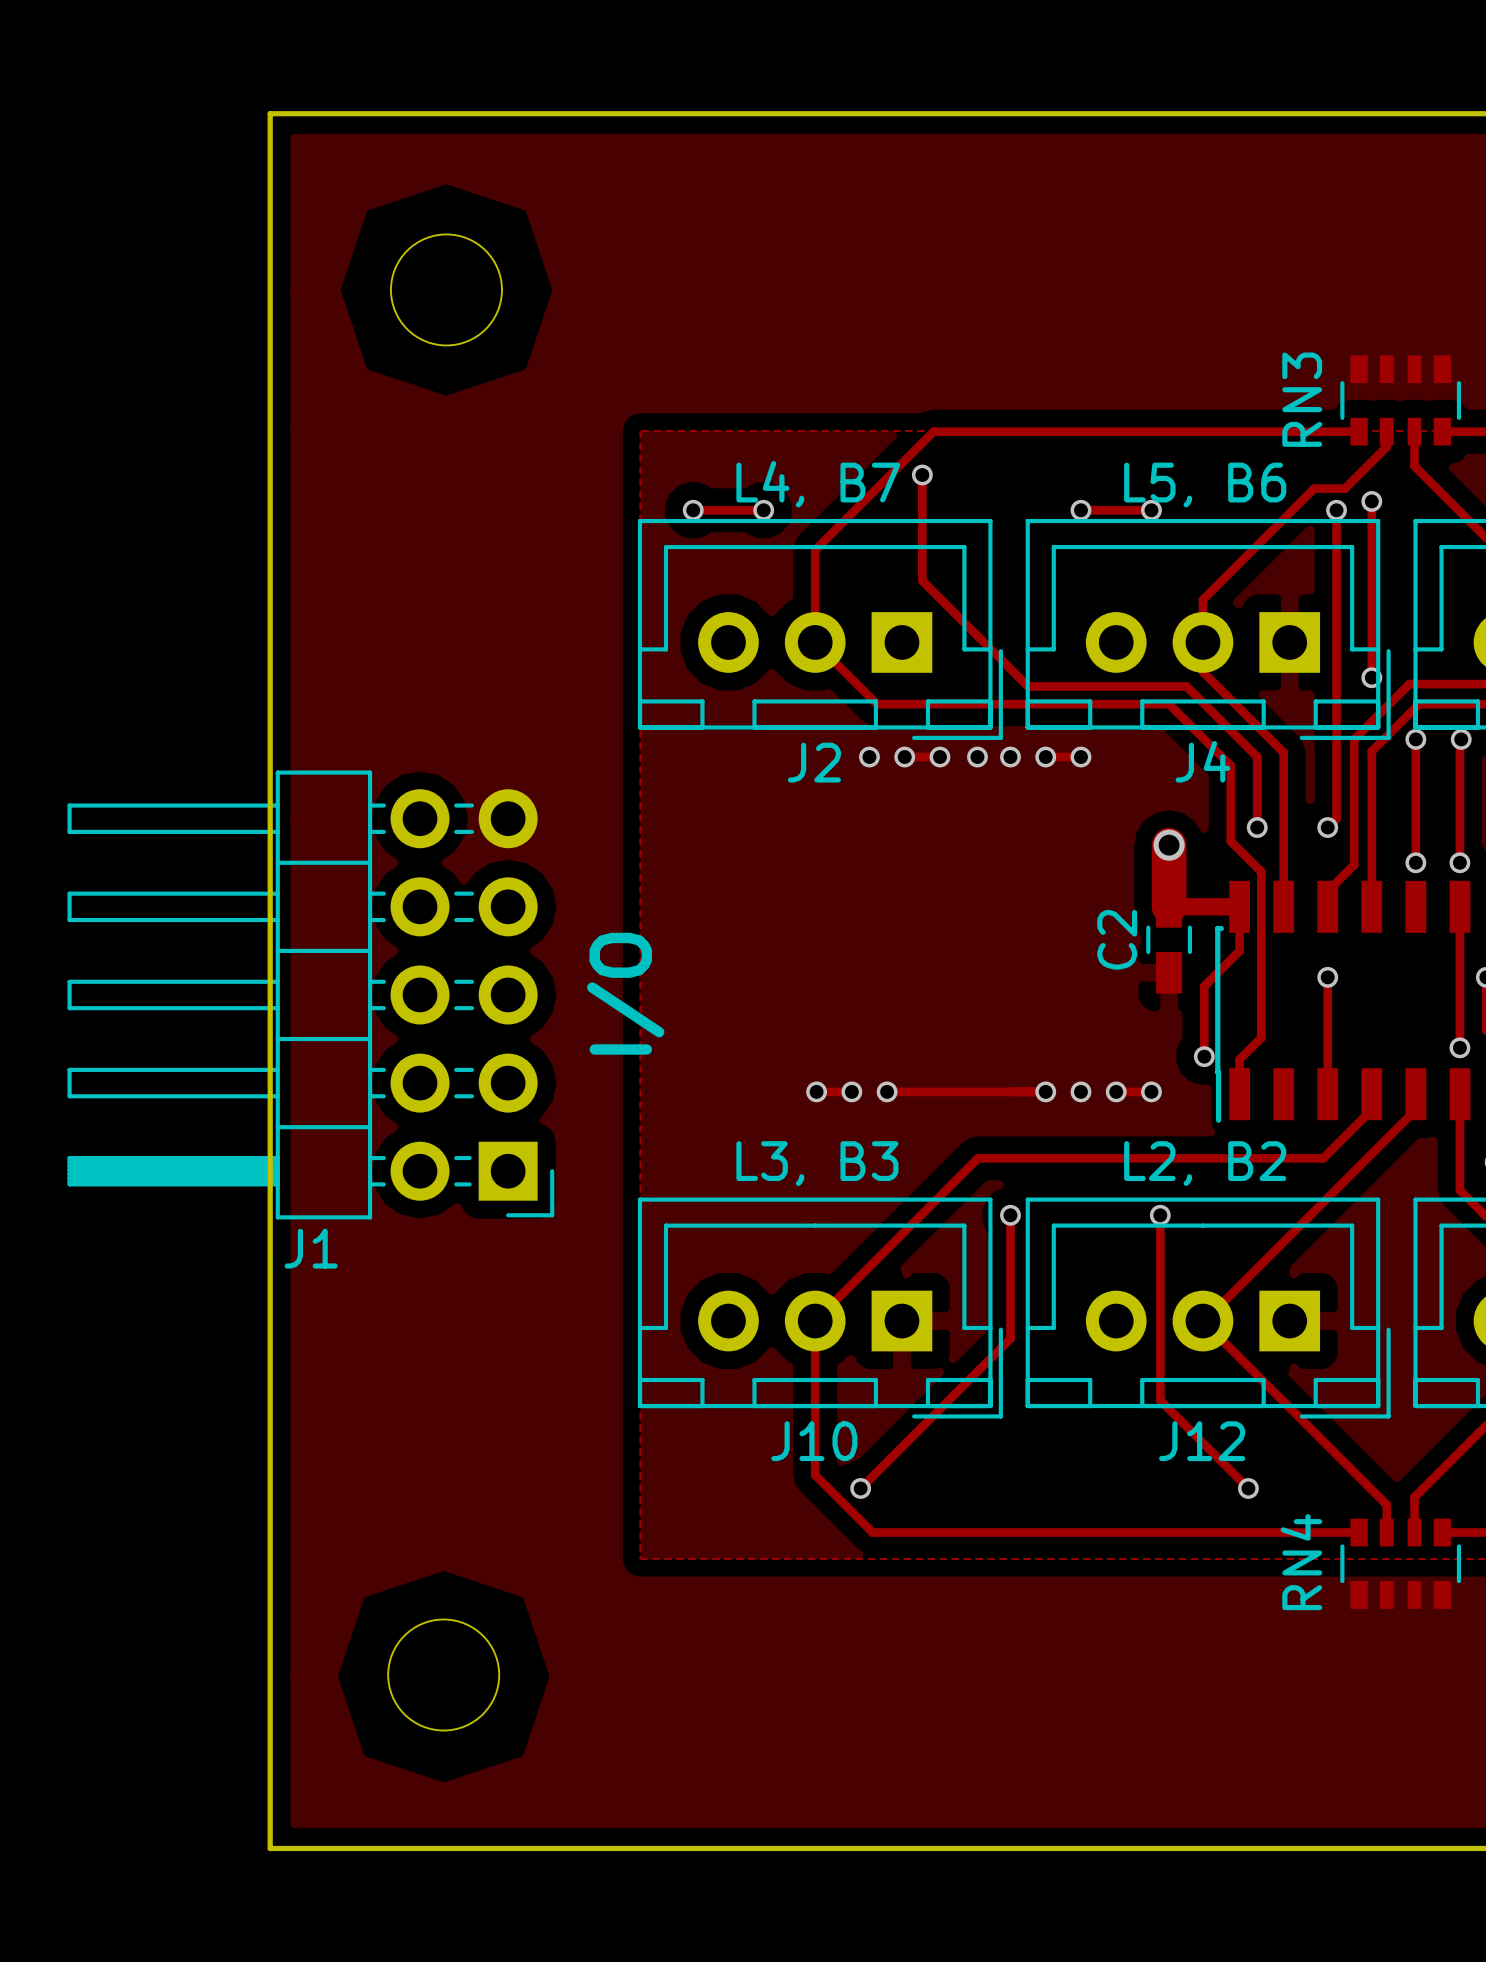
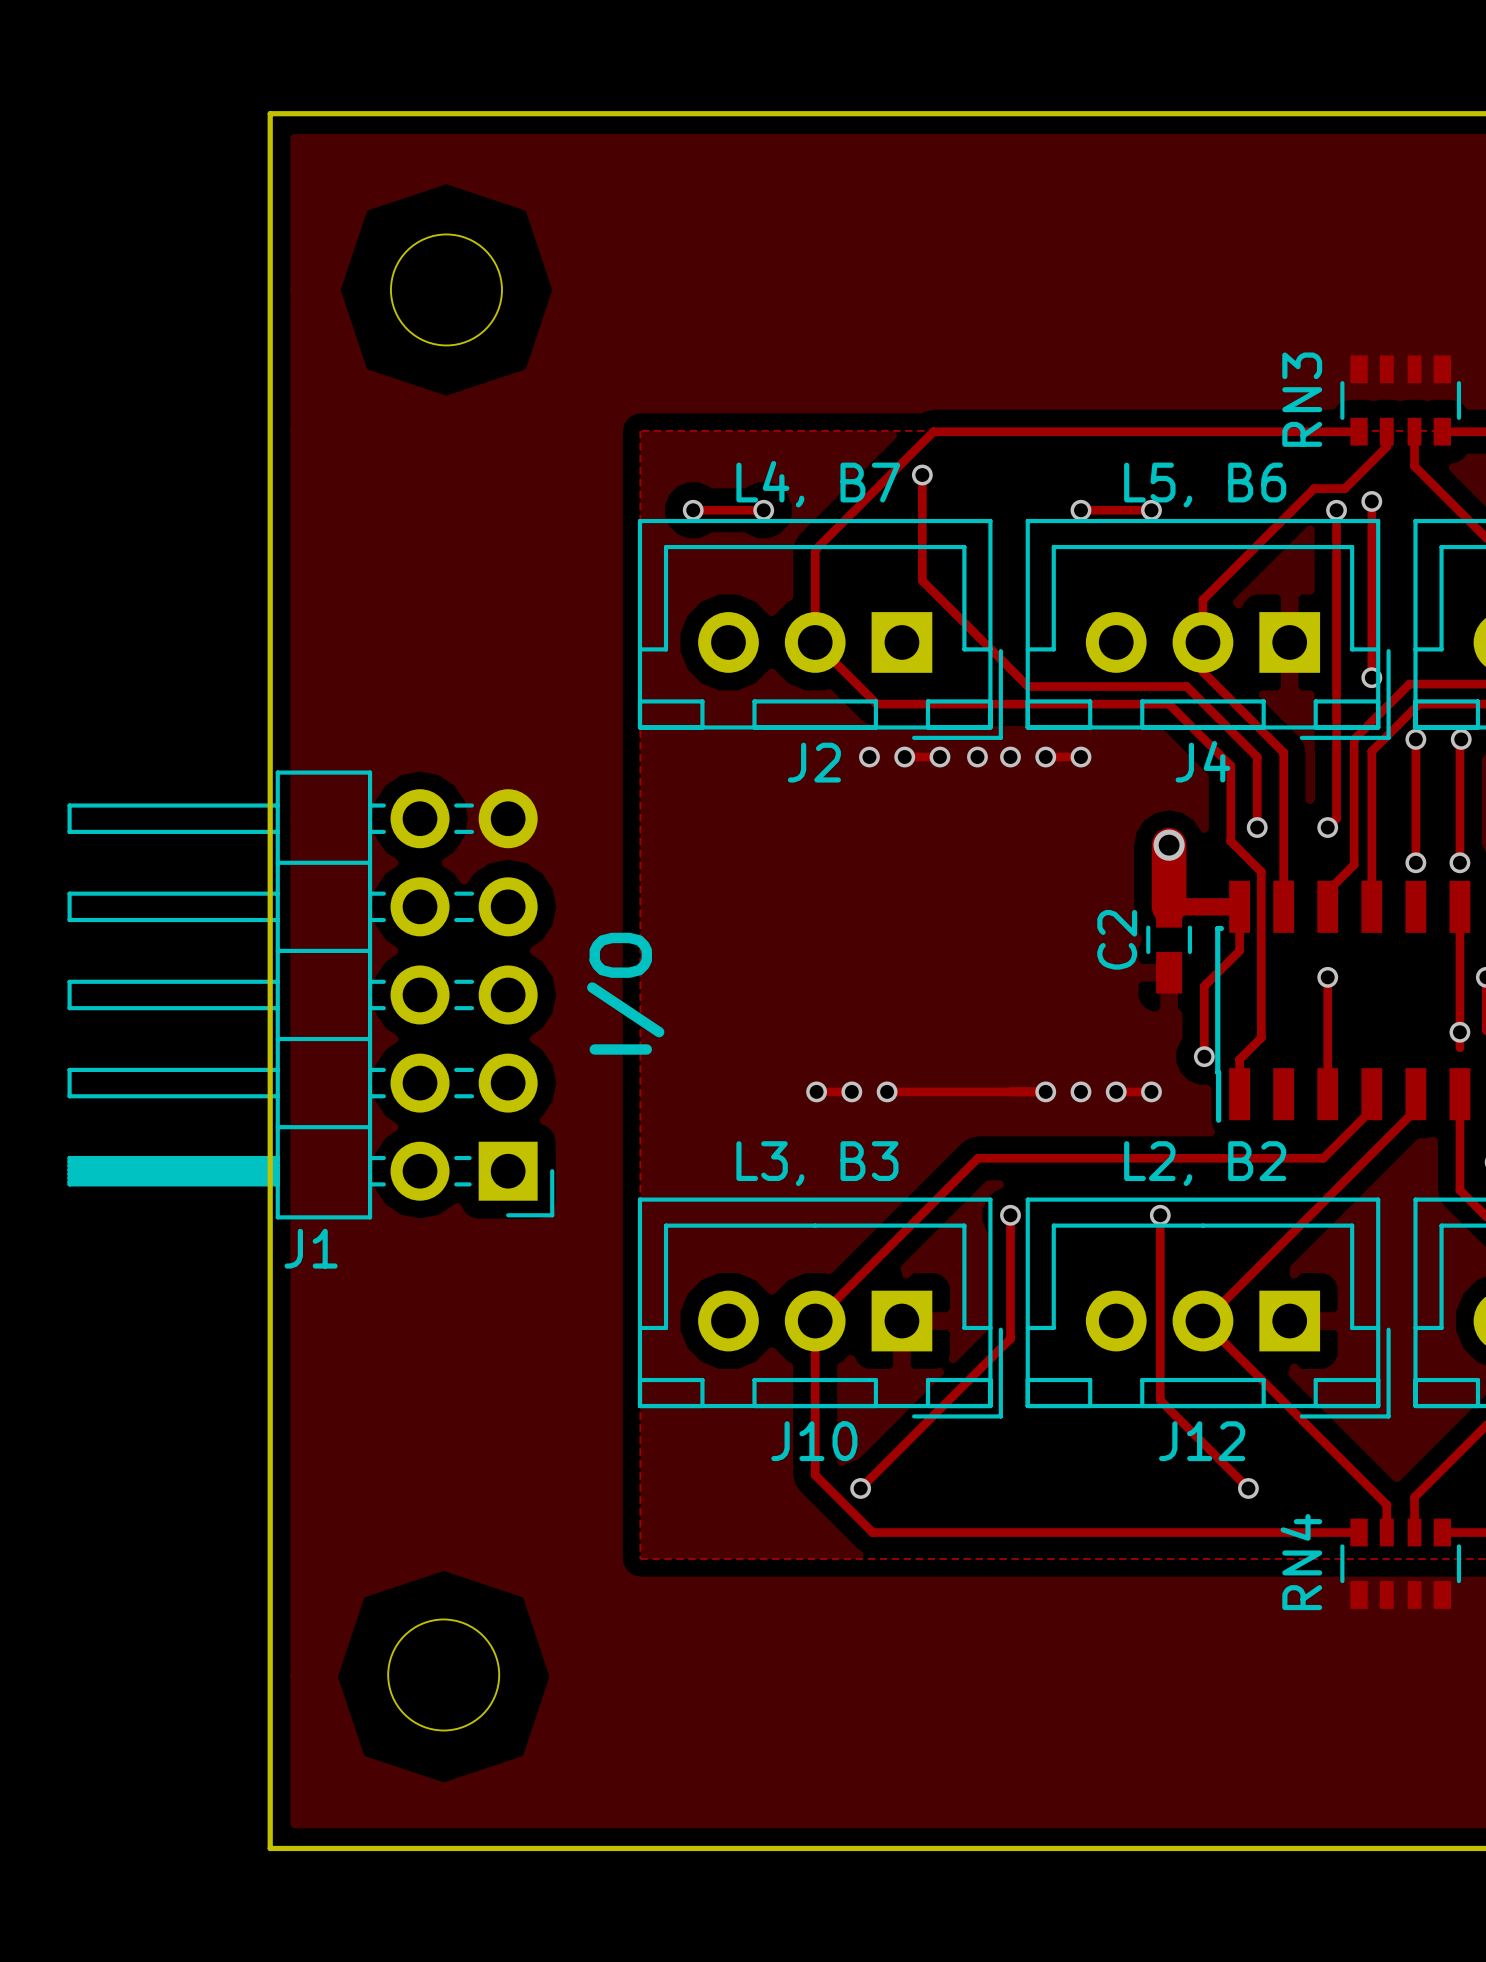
via position: (1459, 1047) -> (1459, 1032)

